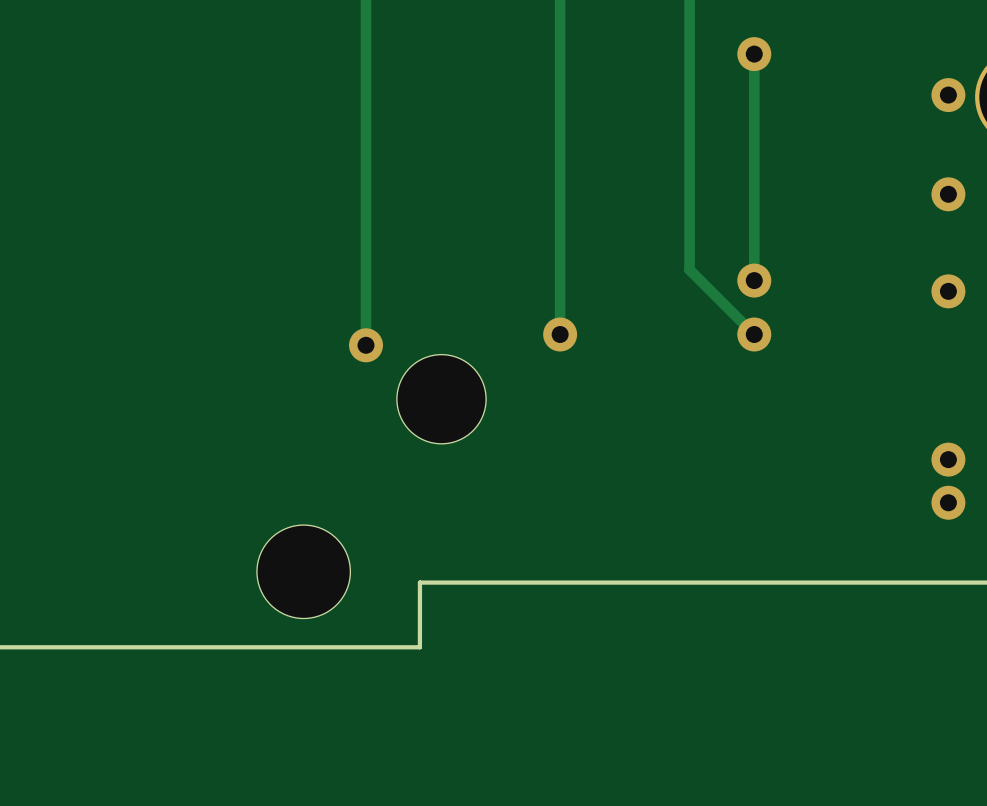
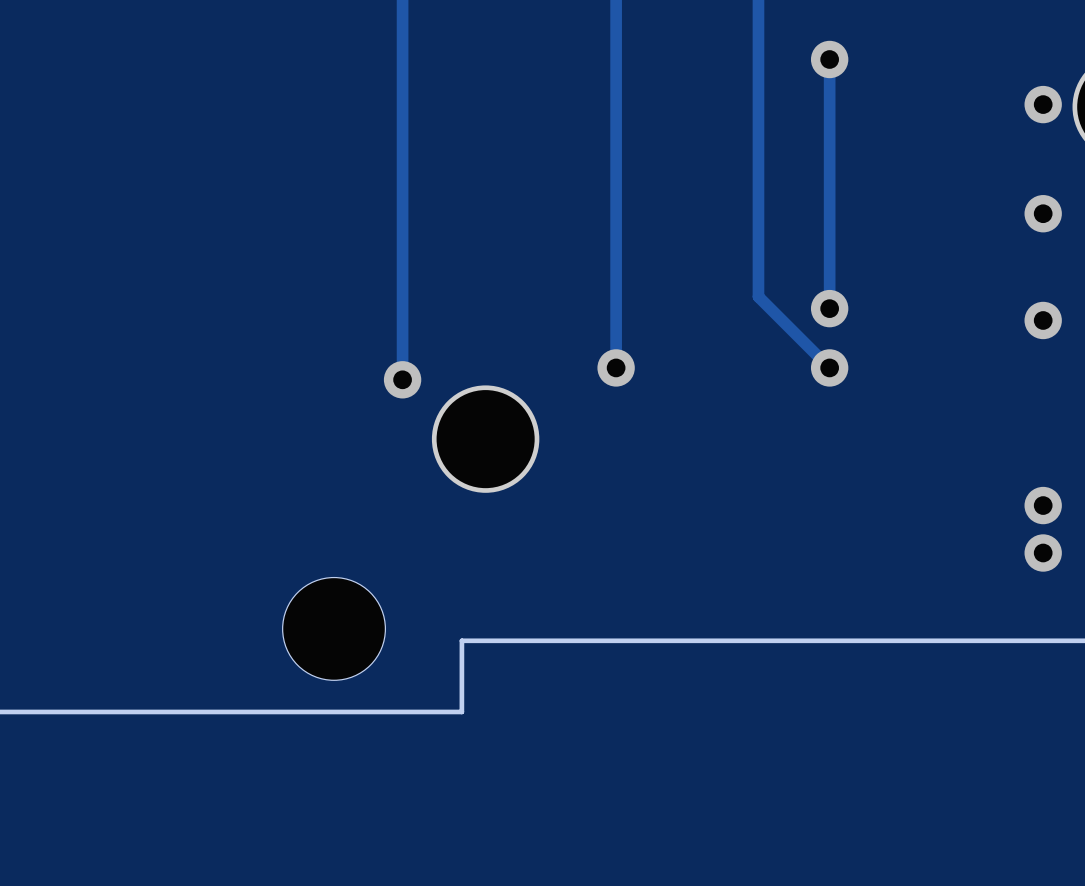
part footprint: [396, 354, 487, 444] -> [431, 385, 540, 493]

